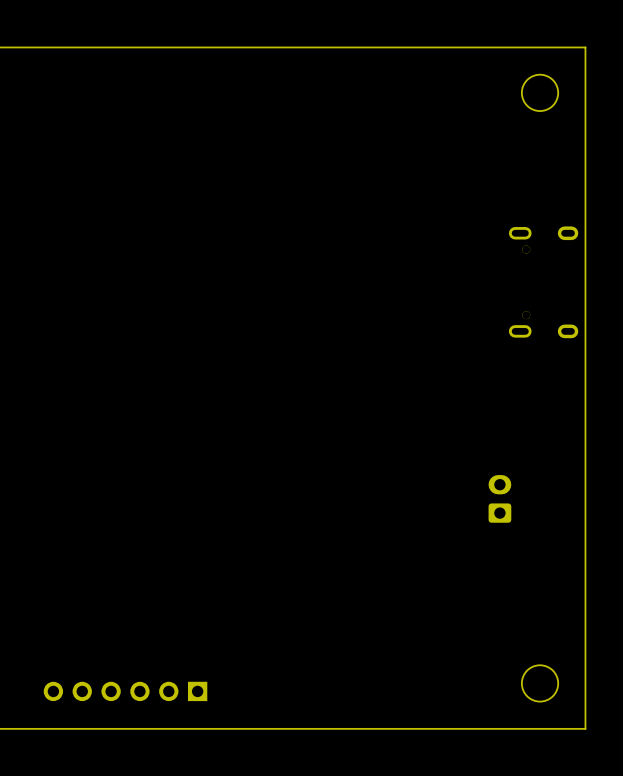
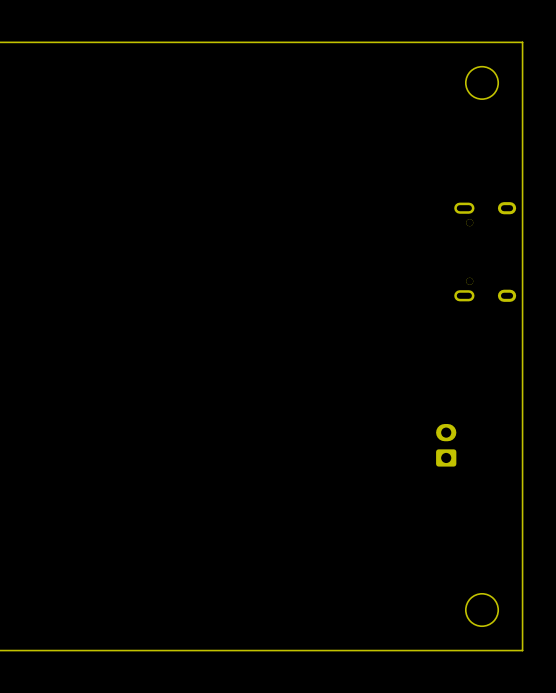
part: (125, 691) -> none

